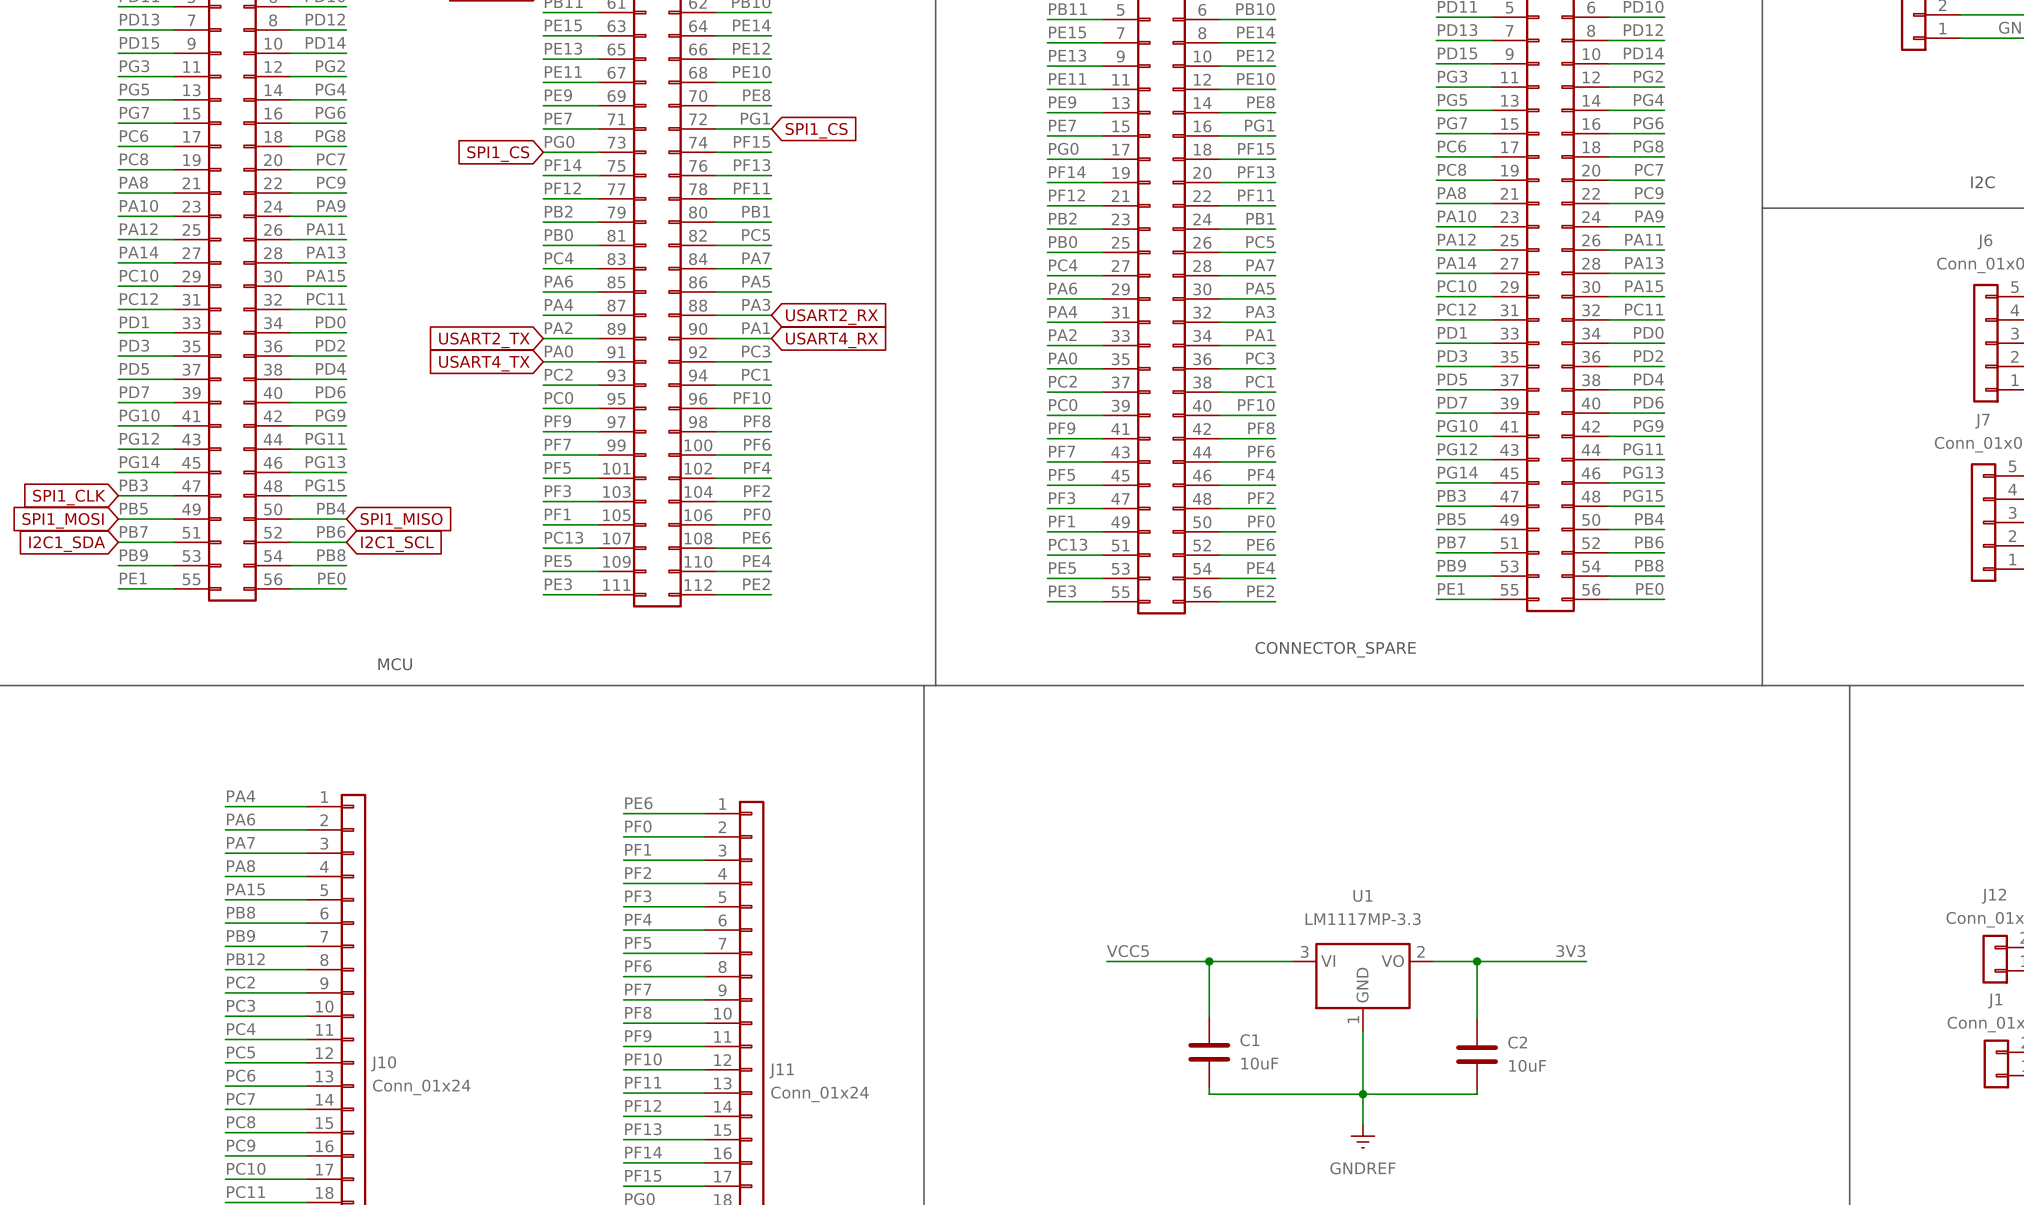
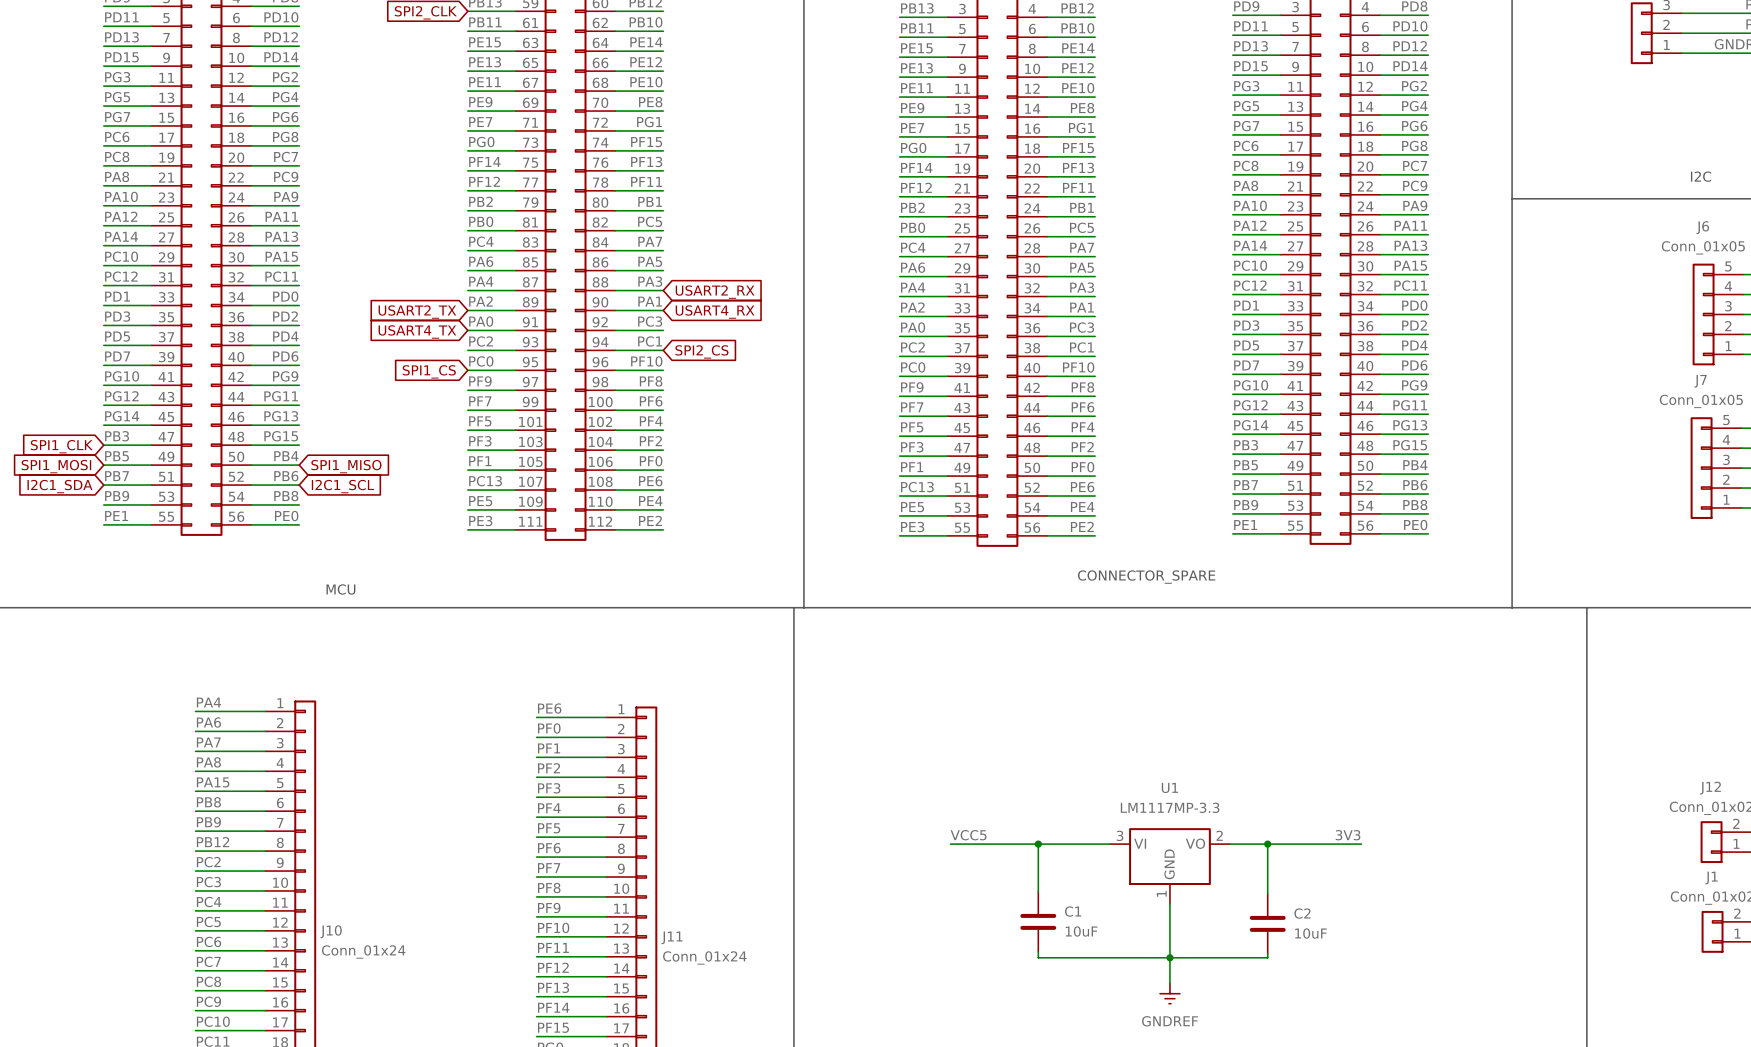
global label: SPI1_CS (816, 130) -> none
global label: SPI1_CS (498, 154) -> none
global label: none -> SPI2_CS (701, 351)
global label: none -> SPI1_CS (429, 371)

